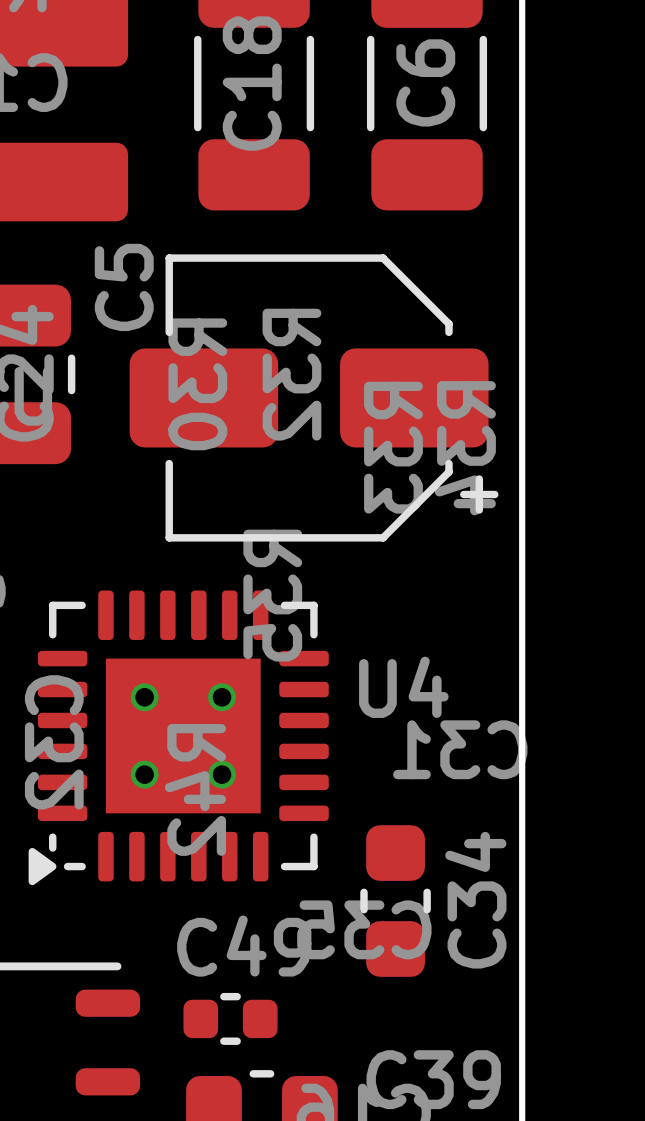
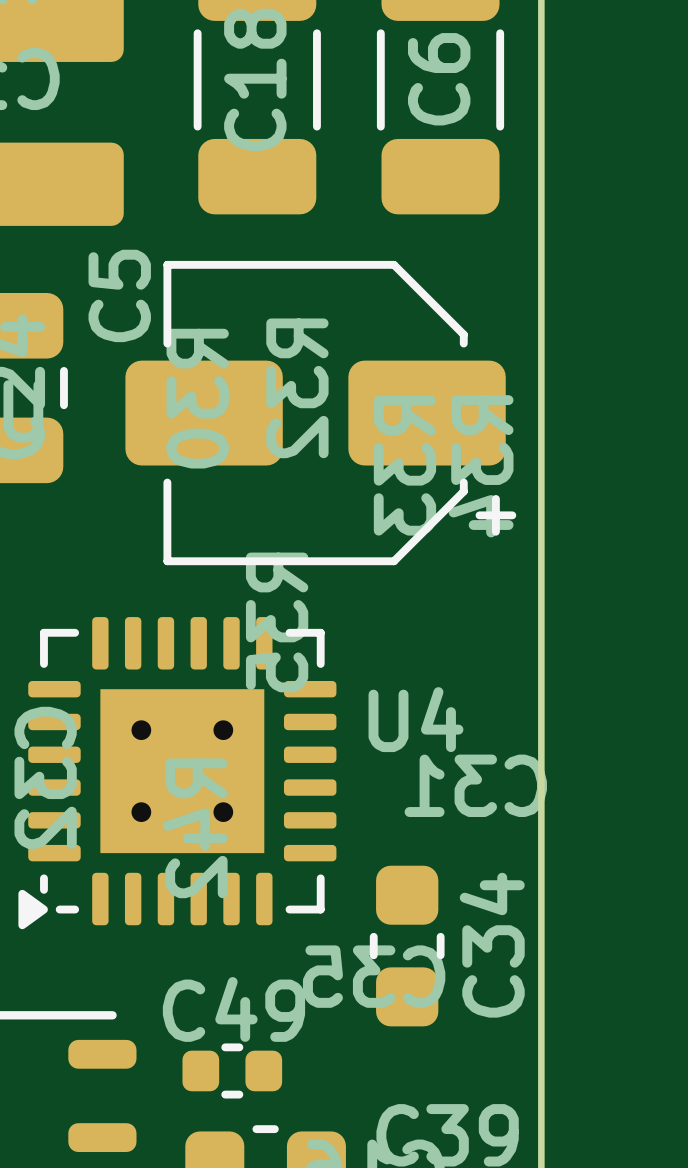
C49 name position: C49 (244, 946) -> C49 (233, 1009)

